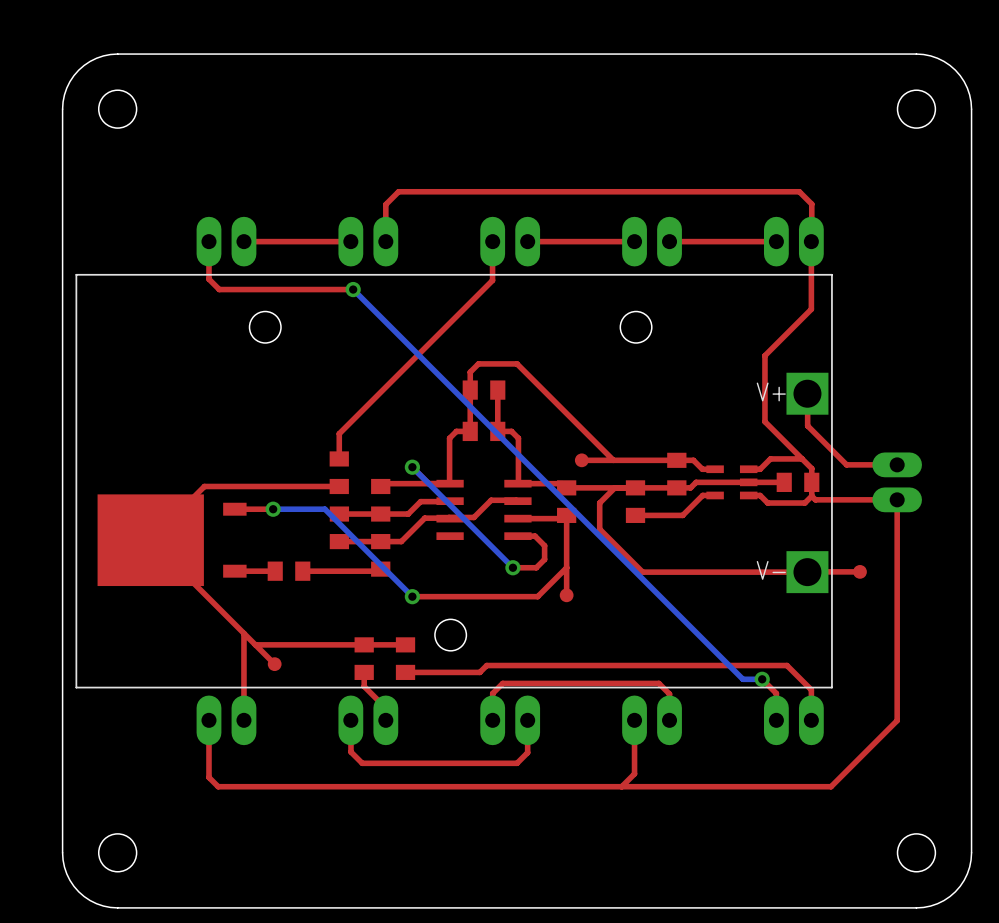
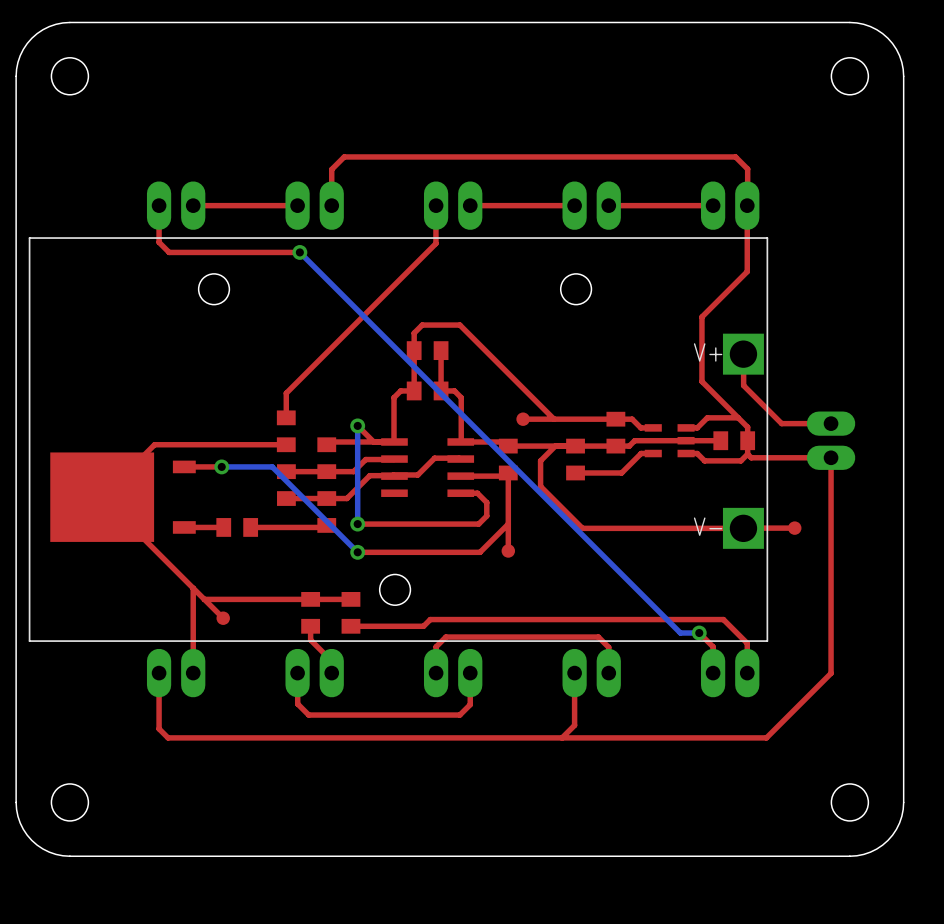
bottom track: (412, 467) (512, 567) -> (357, 425) (357, 524)
via: none -> (357, 524)
top track: none -> (455, 524) (357, 524)
via: (512, 567) -> none

